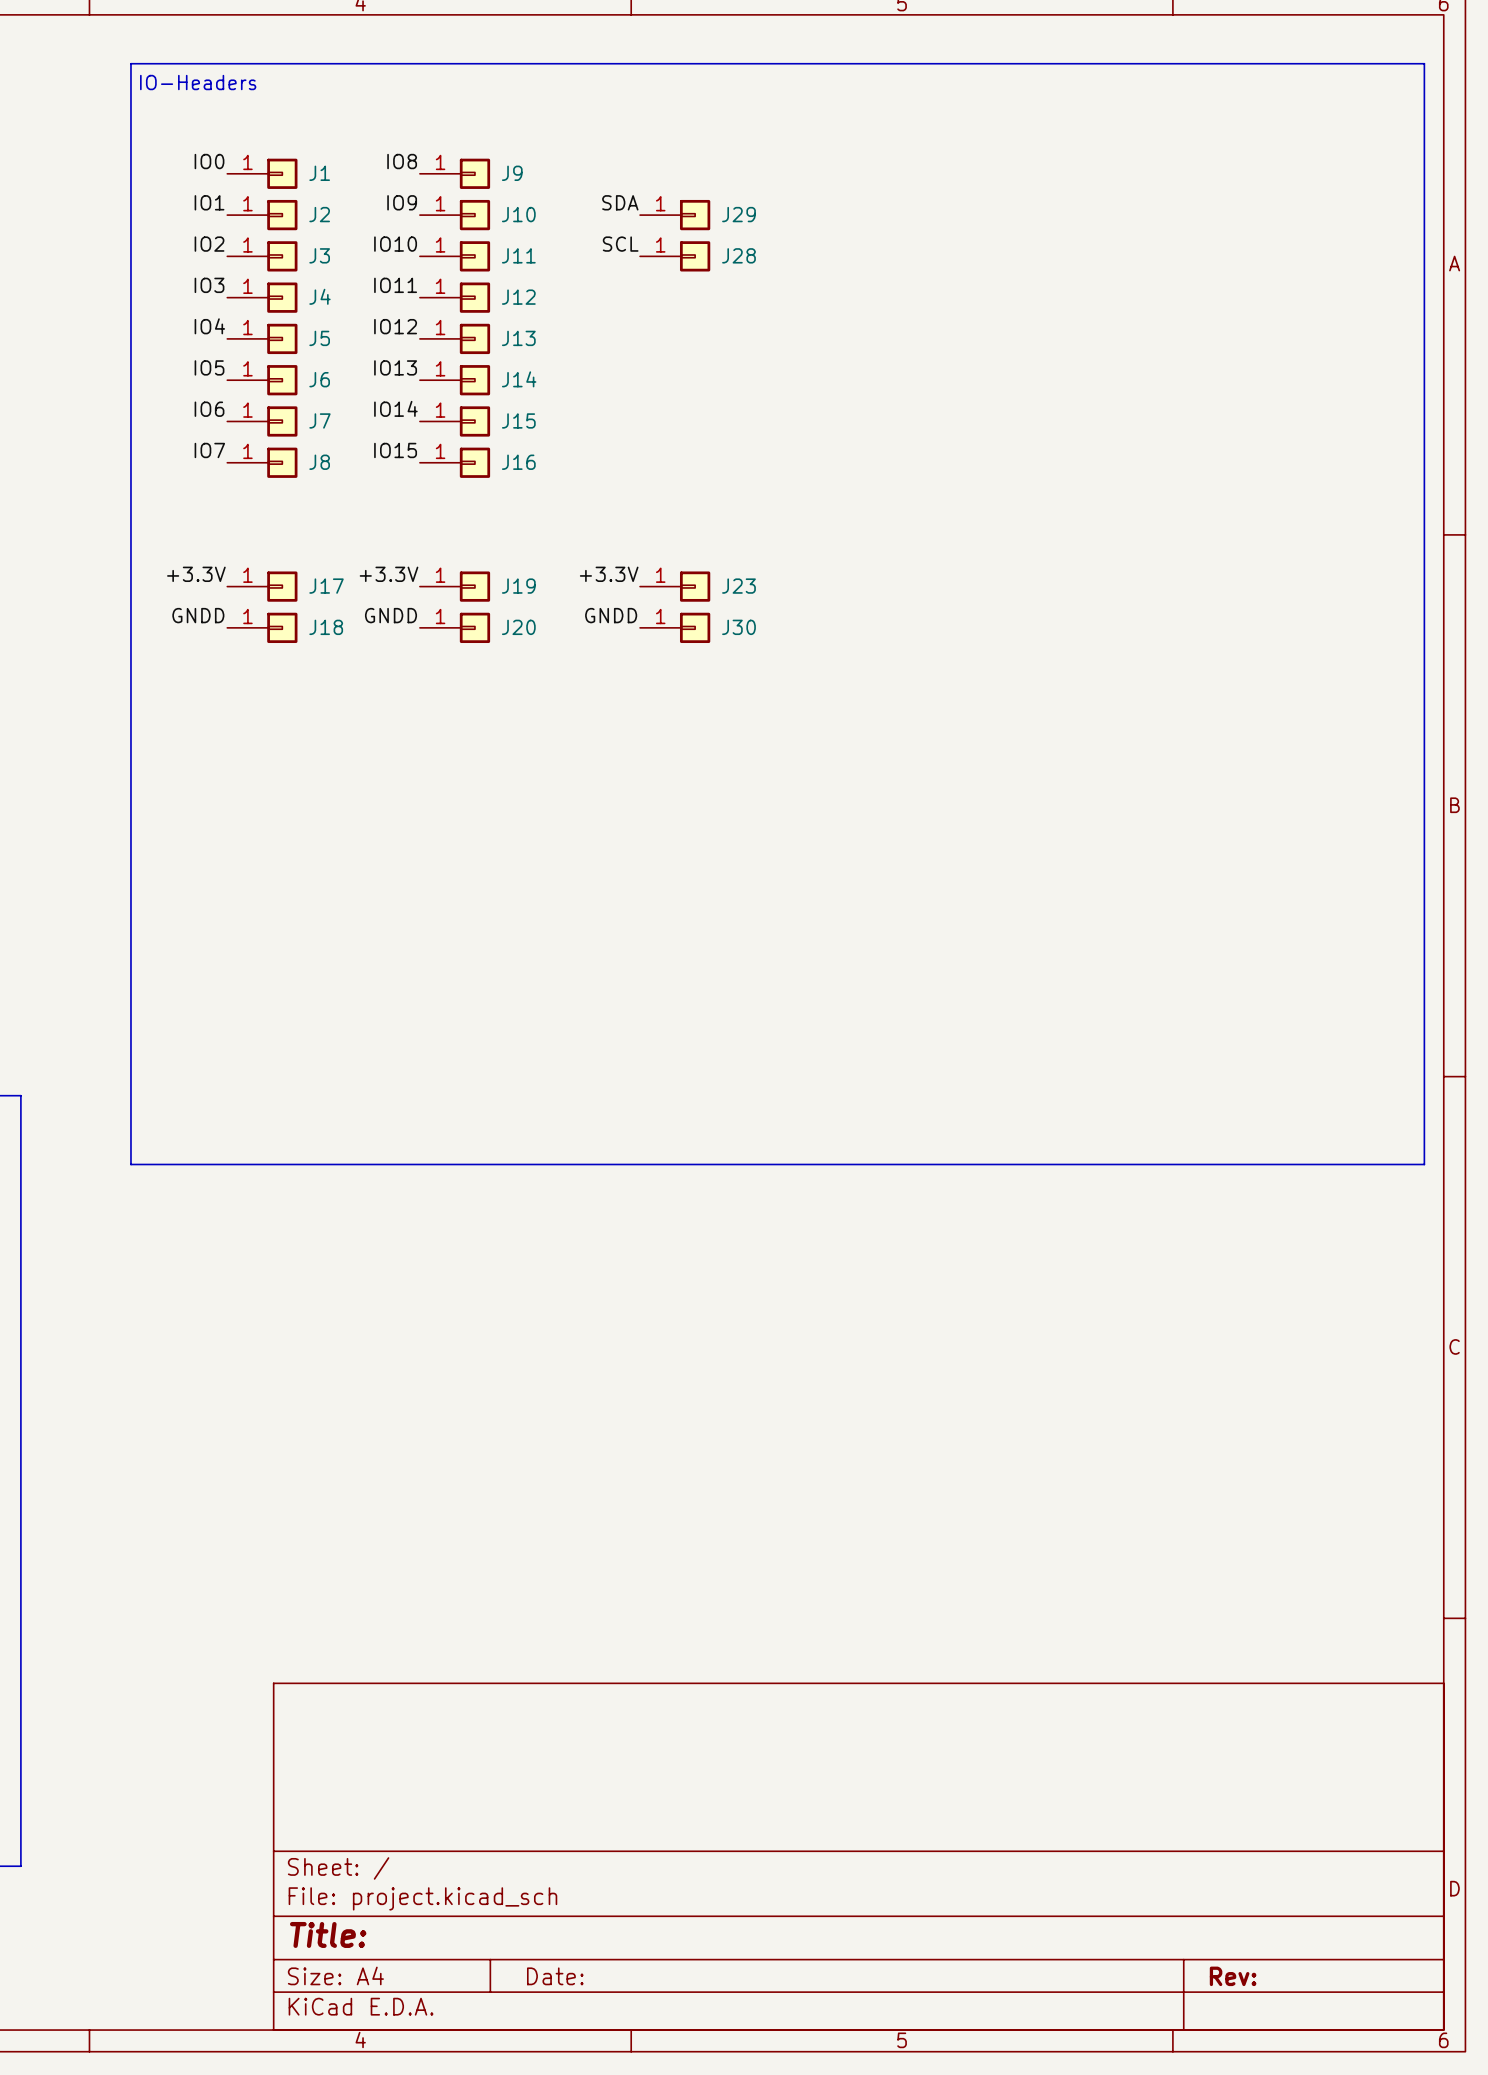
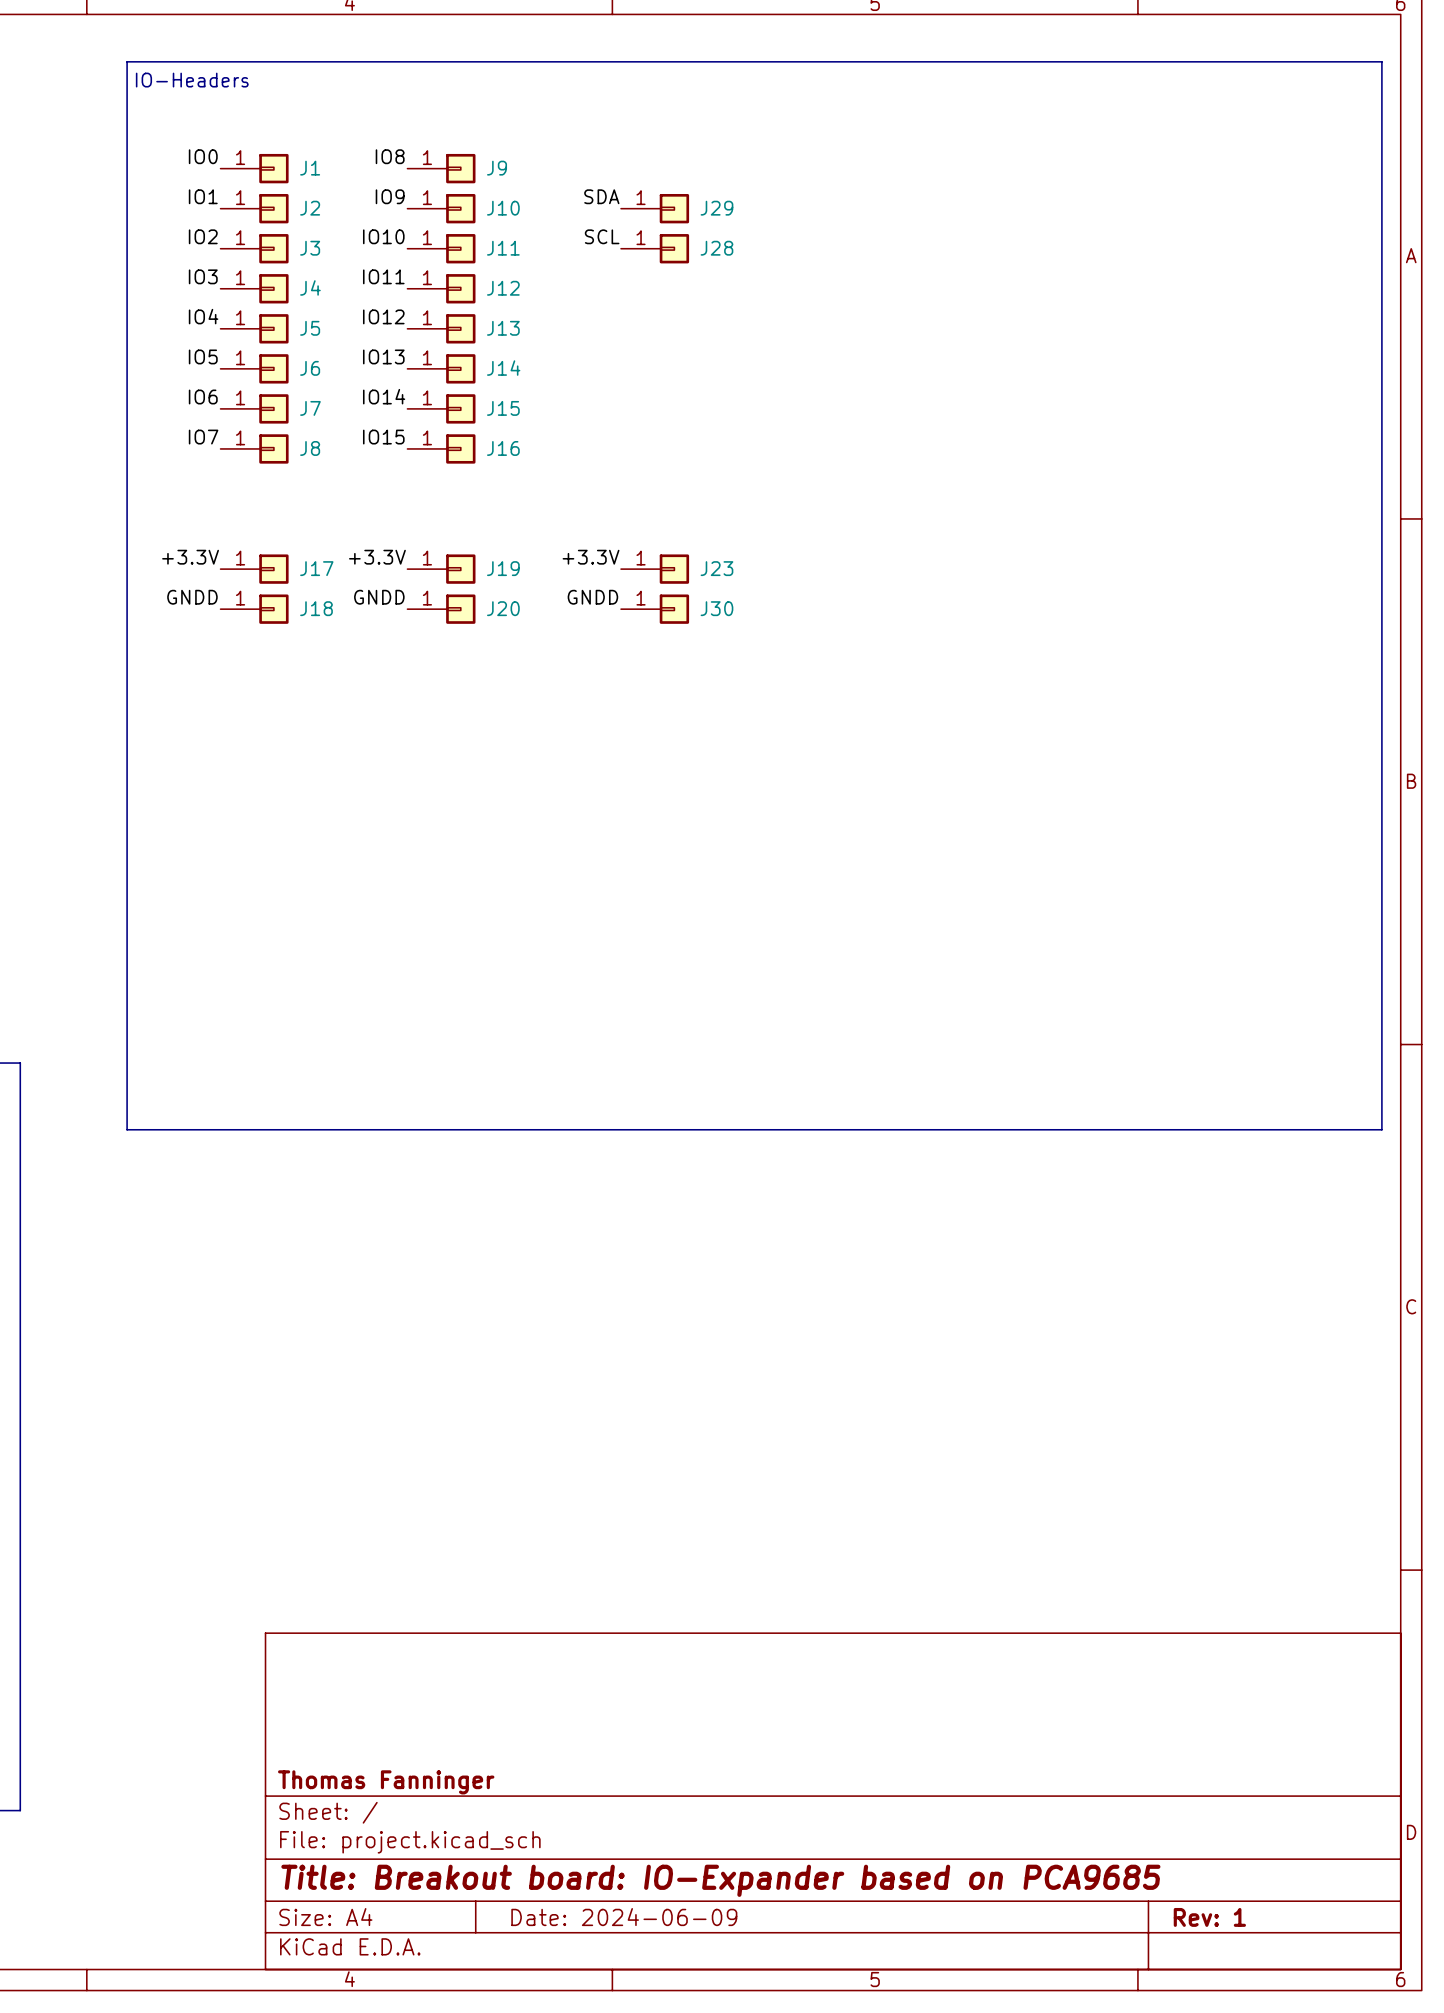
title block: none -> Thomas Fanninger (386, 1782)
title block: Title: (328, 1934) -> Title: Breakout board: IO-Expander based on PCA9685 (720, 1880)
title block: Date: (555, 1976) -> Date: 2024-06-09 (624, 1917)
title block: Rev: (1233, 1976) -> Rev: 1 (1209, 1917)

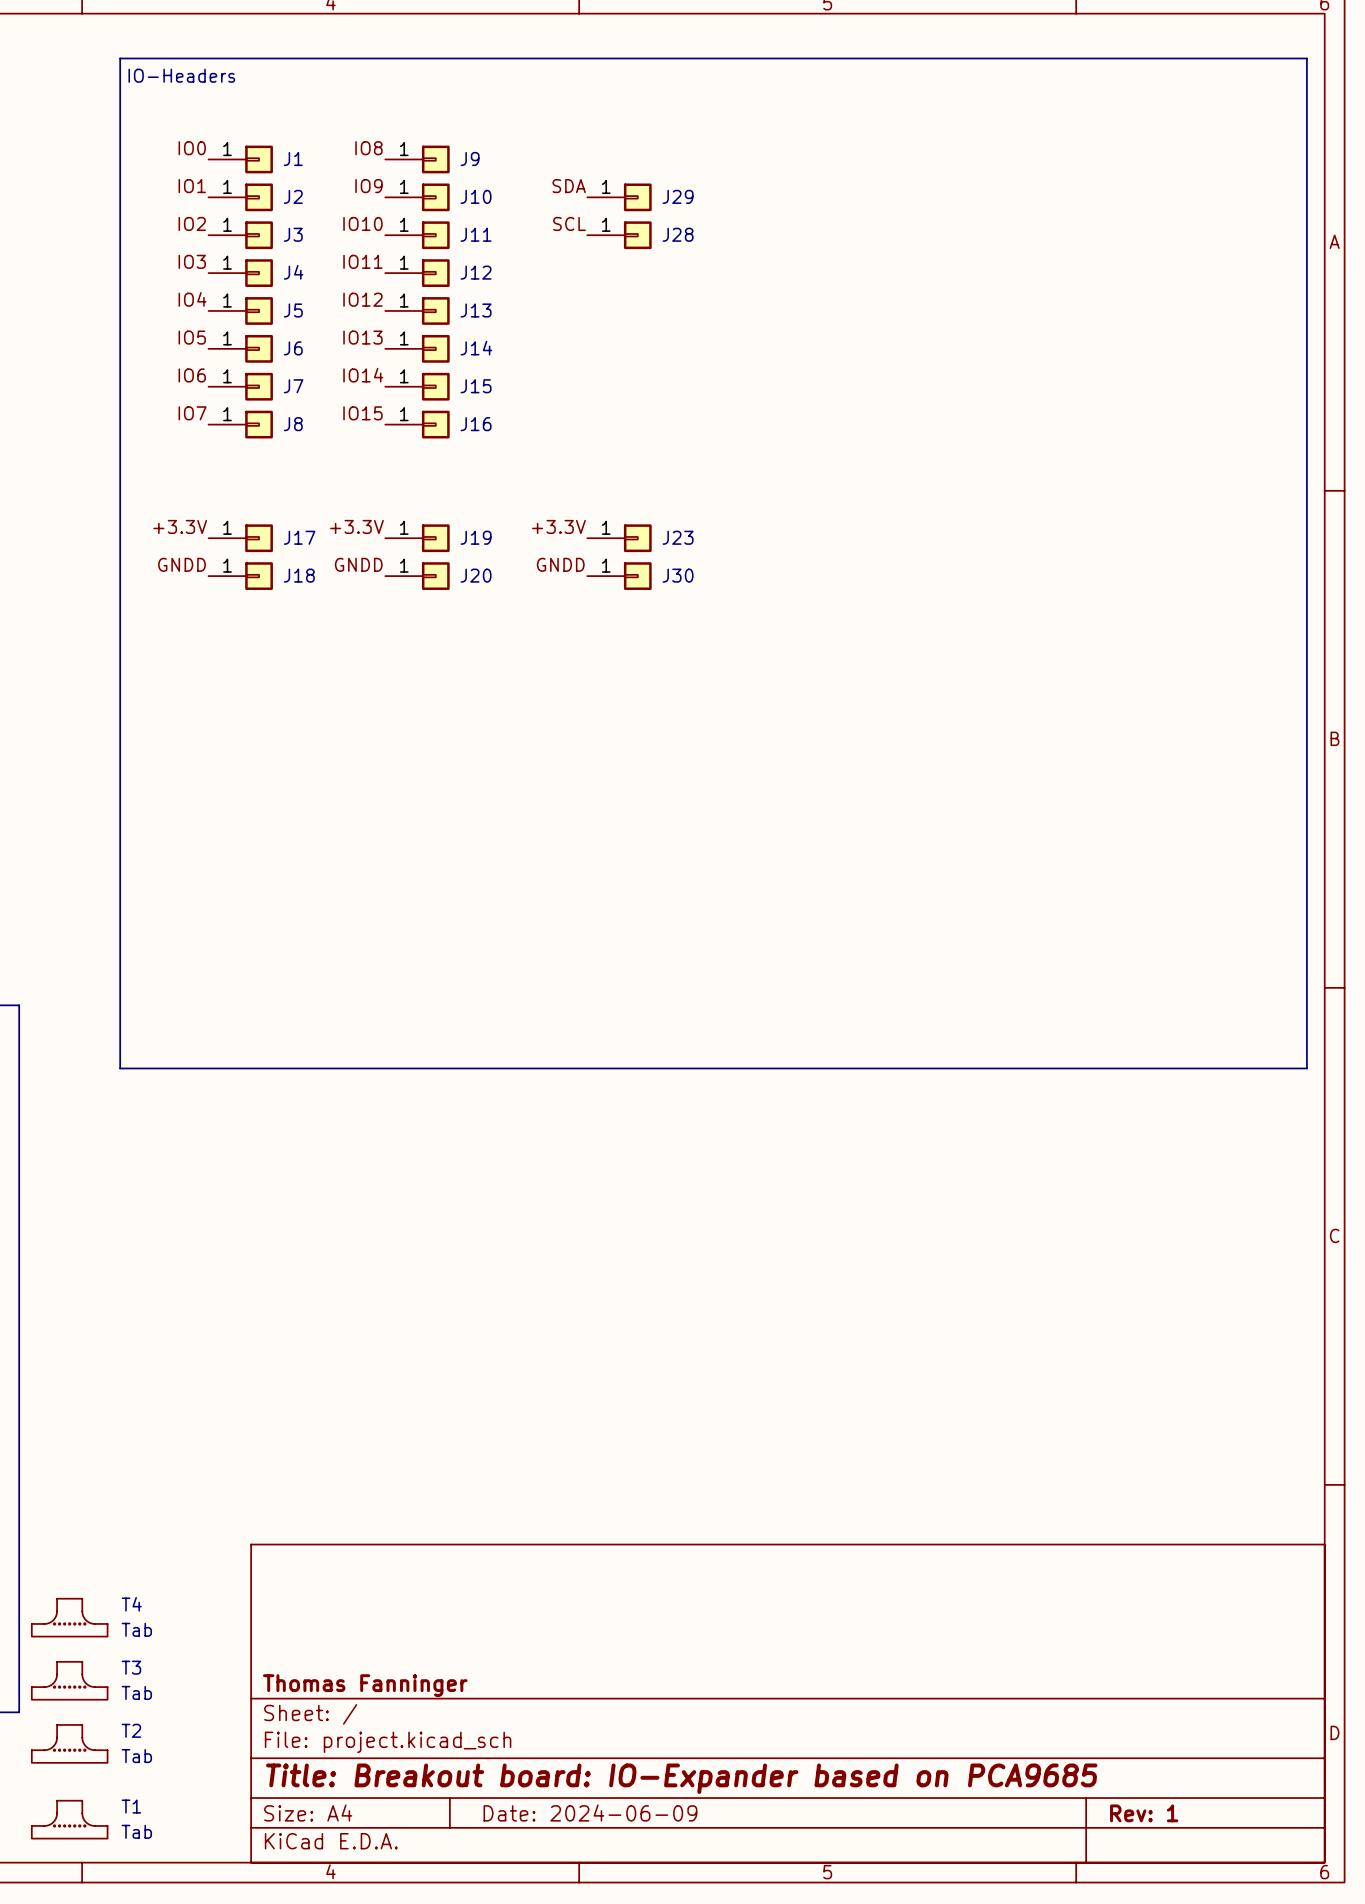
T4: none -> Tab (69, 1617)
T3: none -> Tab (69, 1680)
T2: none -> Tab (69, 1743)
T1: none -> Tab (69, 1819)

